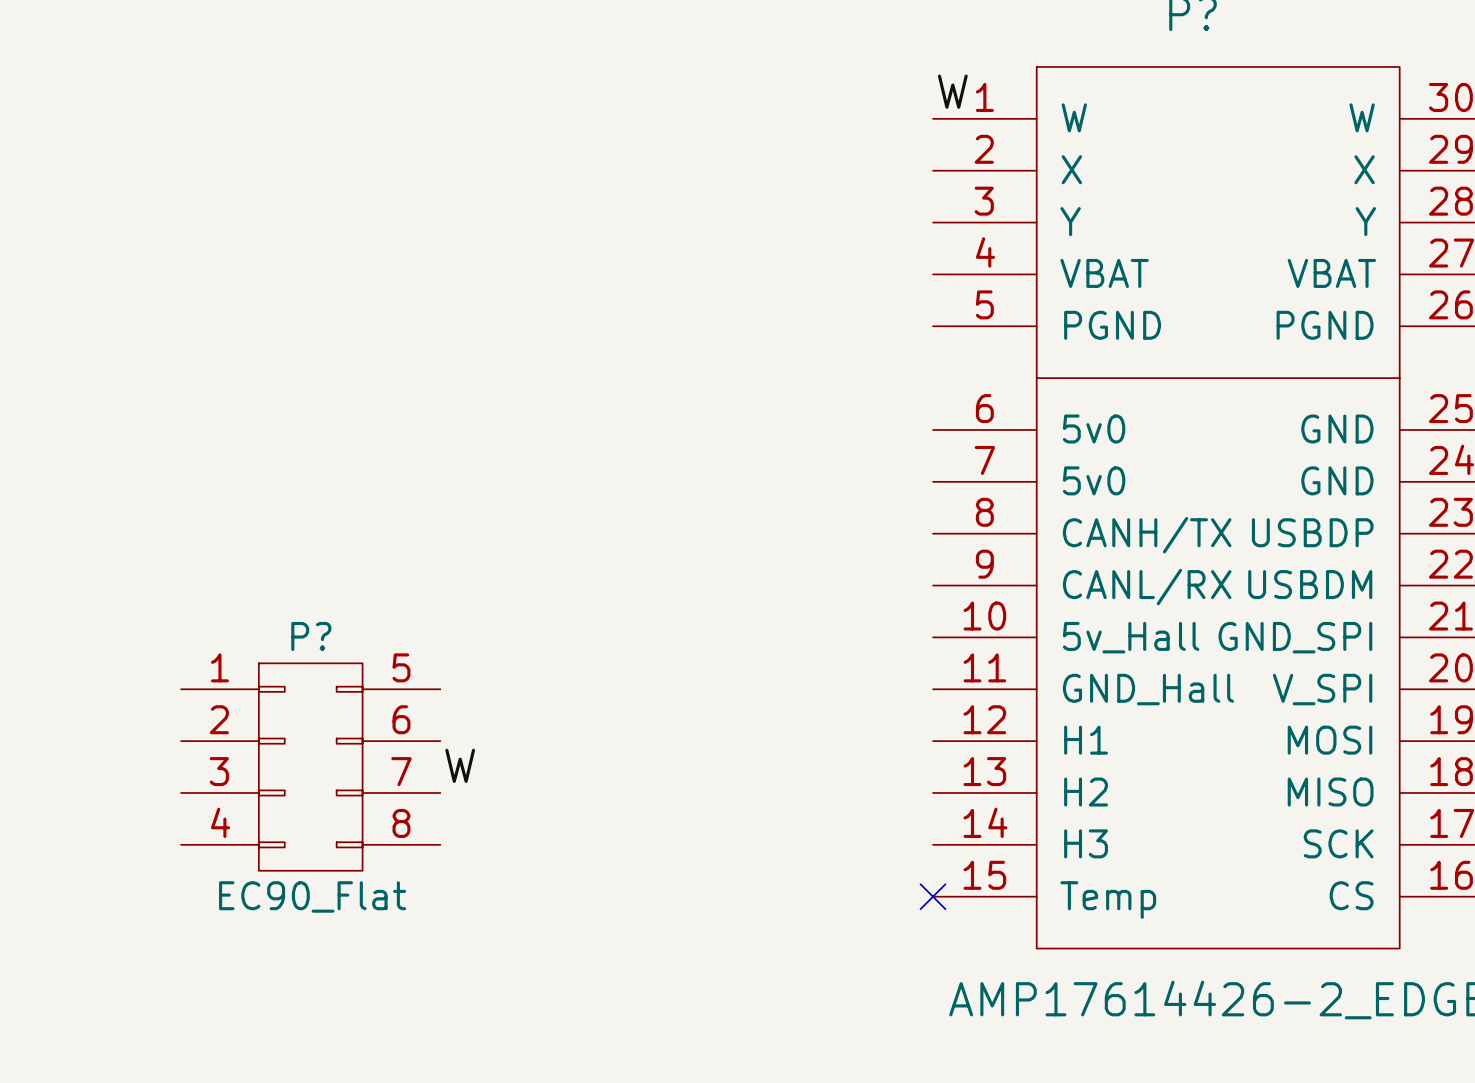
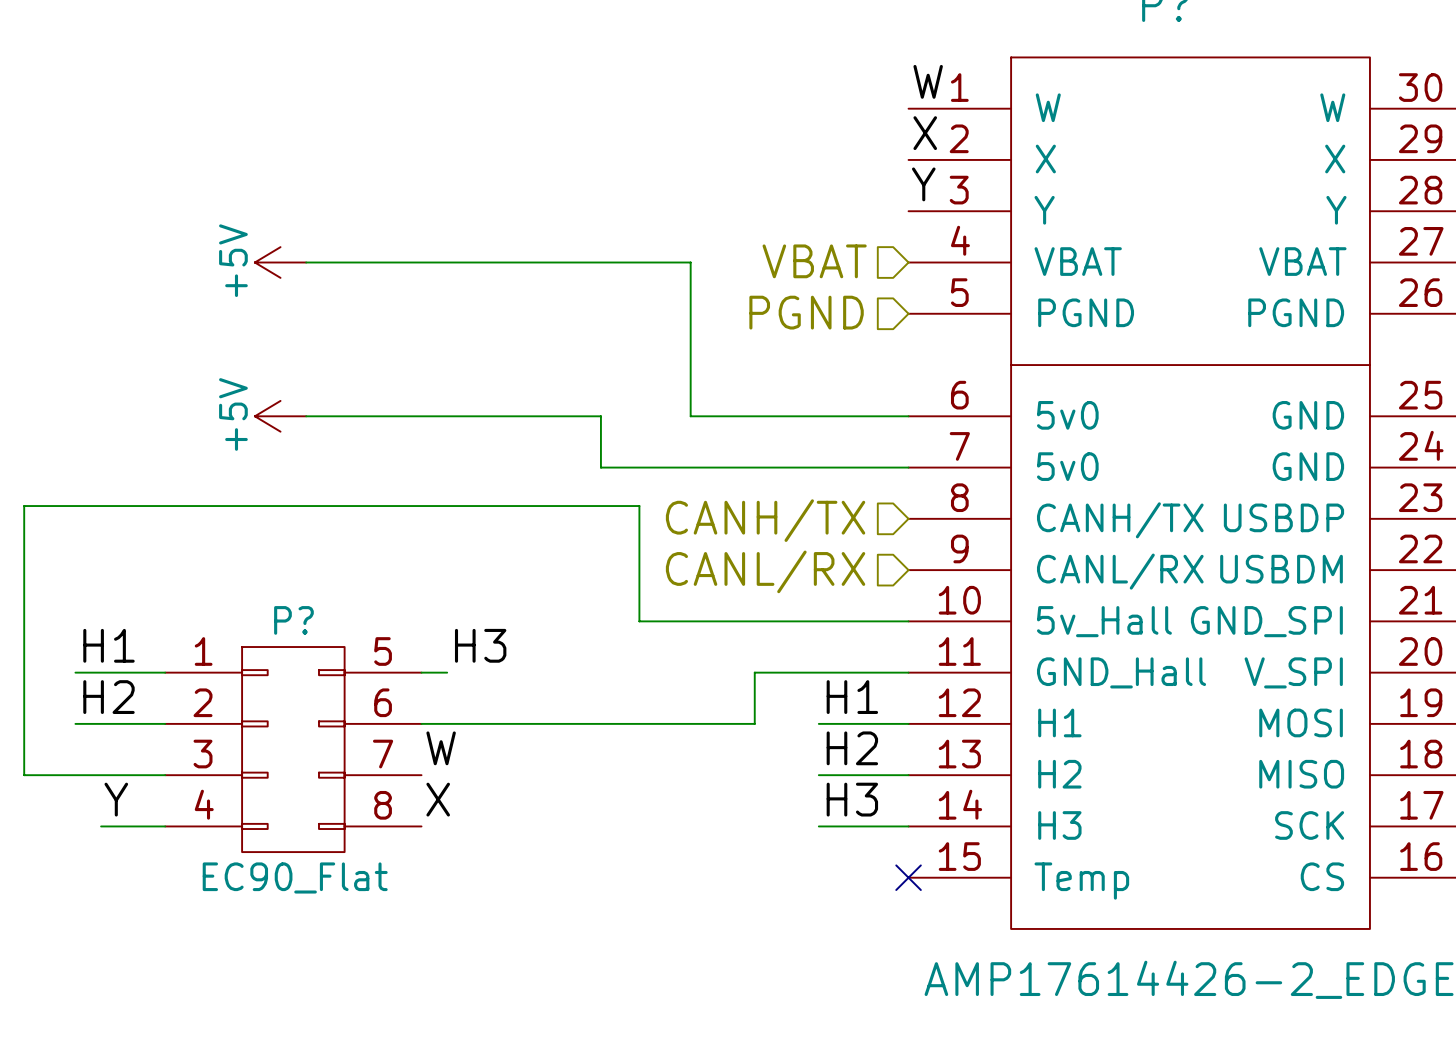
label: none -> X (925, 133)
label: none -> Y (923, 184)
hierarchical label: none -> VBAT (814, 261)
power symbol: none -> +5V (280, 262)
wire: none -> (306, 262) (690, 262) (690, 416) (908, 416)
hierarchical label: none -> PGND (806, 312)
power symbol: none -> +5V (280, 416)
wire: none -> (306, 416) (600, 416) (600, 467) (908, 467)
hierarchical label: none -> CANH/TX (765, 520)
hierarchical label: none -> CANL/RX (765, 571)
wire: none -> (908, 621) (639, 621) (639, 506) (24, 506) (24, 775) (165, 775)
label: none -> H1 (108, 645)
label: none -> H3 (480, 645)
wire: none -> (75, 672) (165, 672)
wire: none -> (421, 672) (447, 672)
wire: none -> (908, 672) (754, 672) (754, 723) (421, 723)
label: none -> H2 (108, 697)
label: none -> H1 (852, 697)
wire: none -> (75, 723) (165, 723)
wire: none -> (818, 723) (908, 723)
label: none -> H2 (852, 748)
wire: none -> (818, 775) (908, 775)
label: none -> Y (116, 799)
label: none -> X (438, 799)
label: none -> H3 (852, 799)
wire: none -> (101, 826) (165, 826)
wire: none -> (818, 826) (908, 826)

